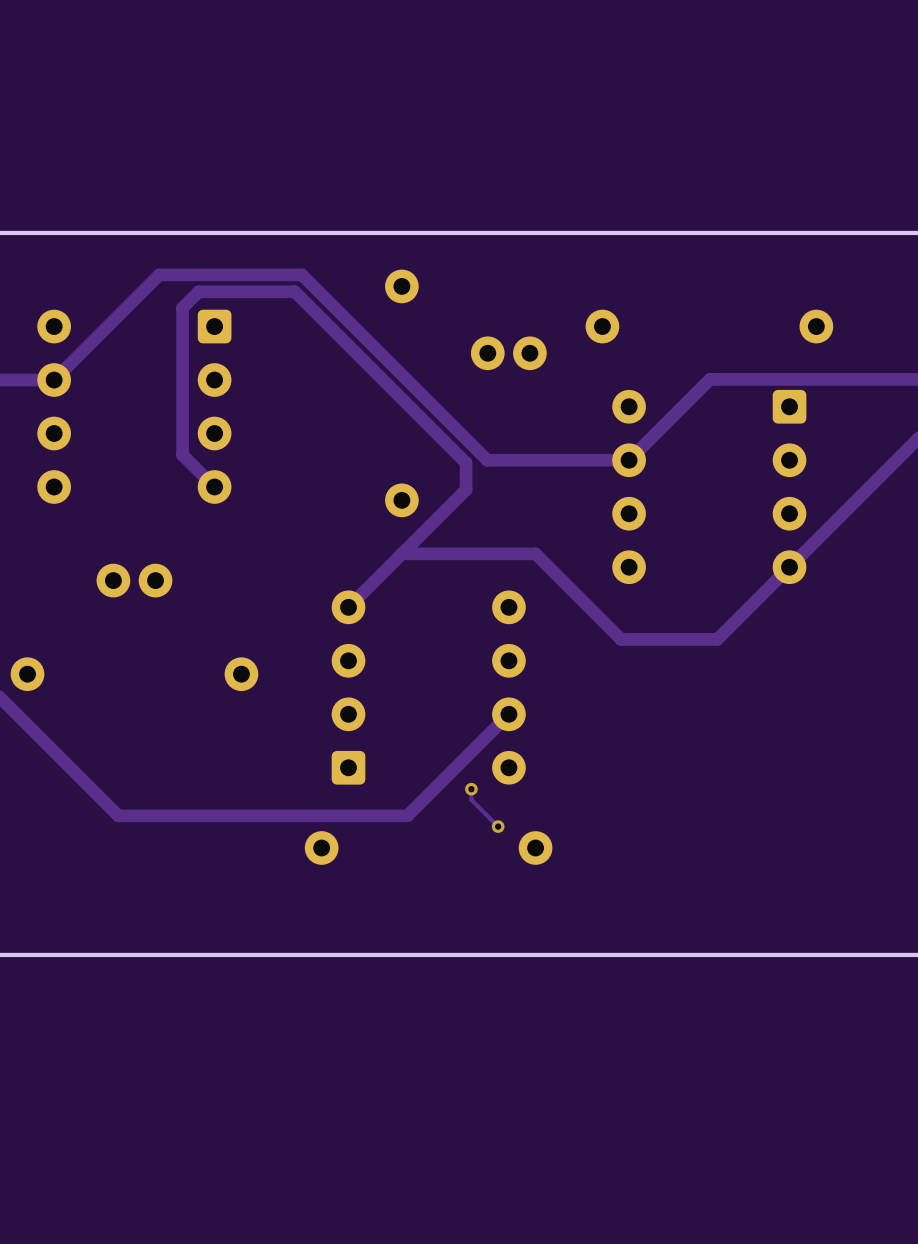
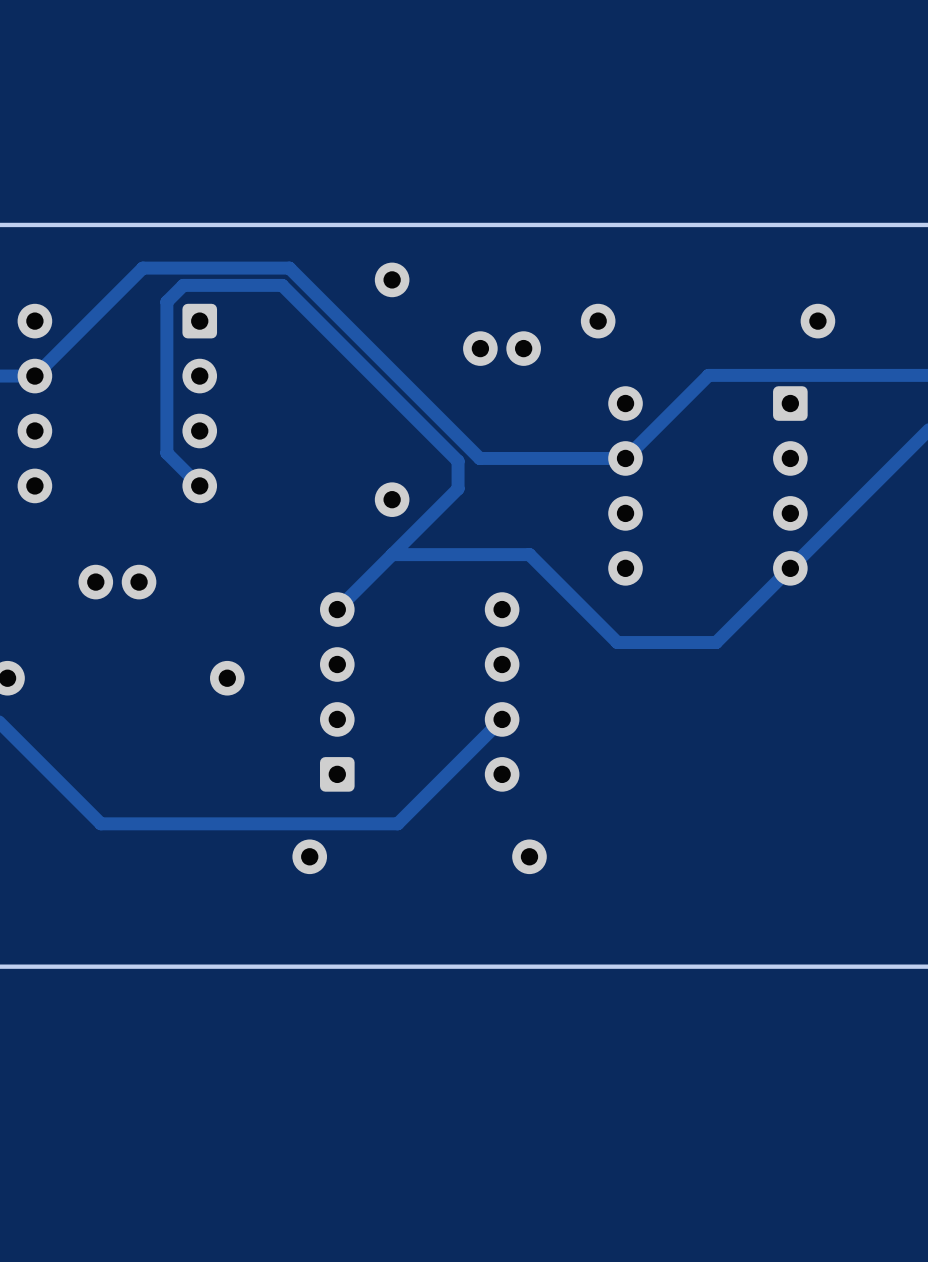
track: (471, 789) (471, 799) (498, 826) -> none
via: (471, 789) -> none
via: (498, 826) -> none

